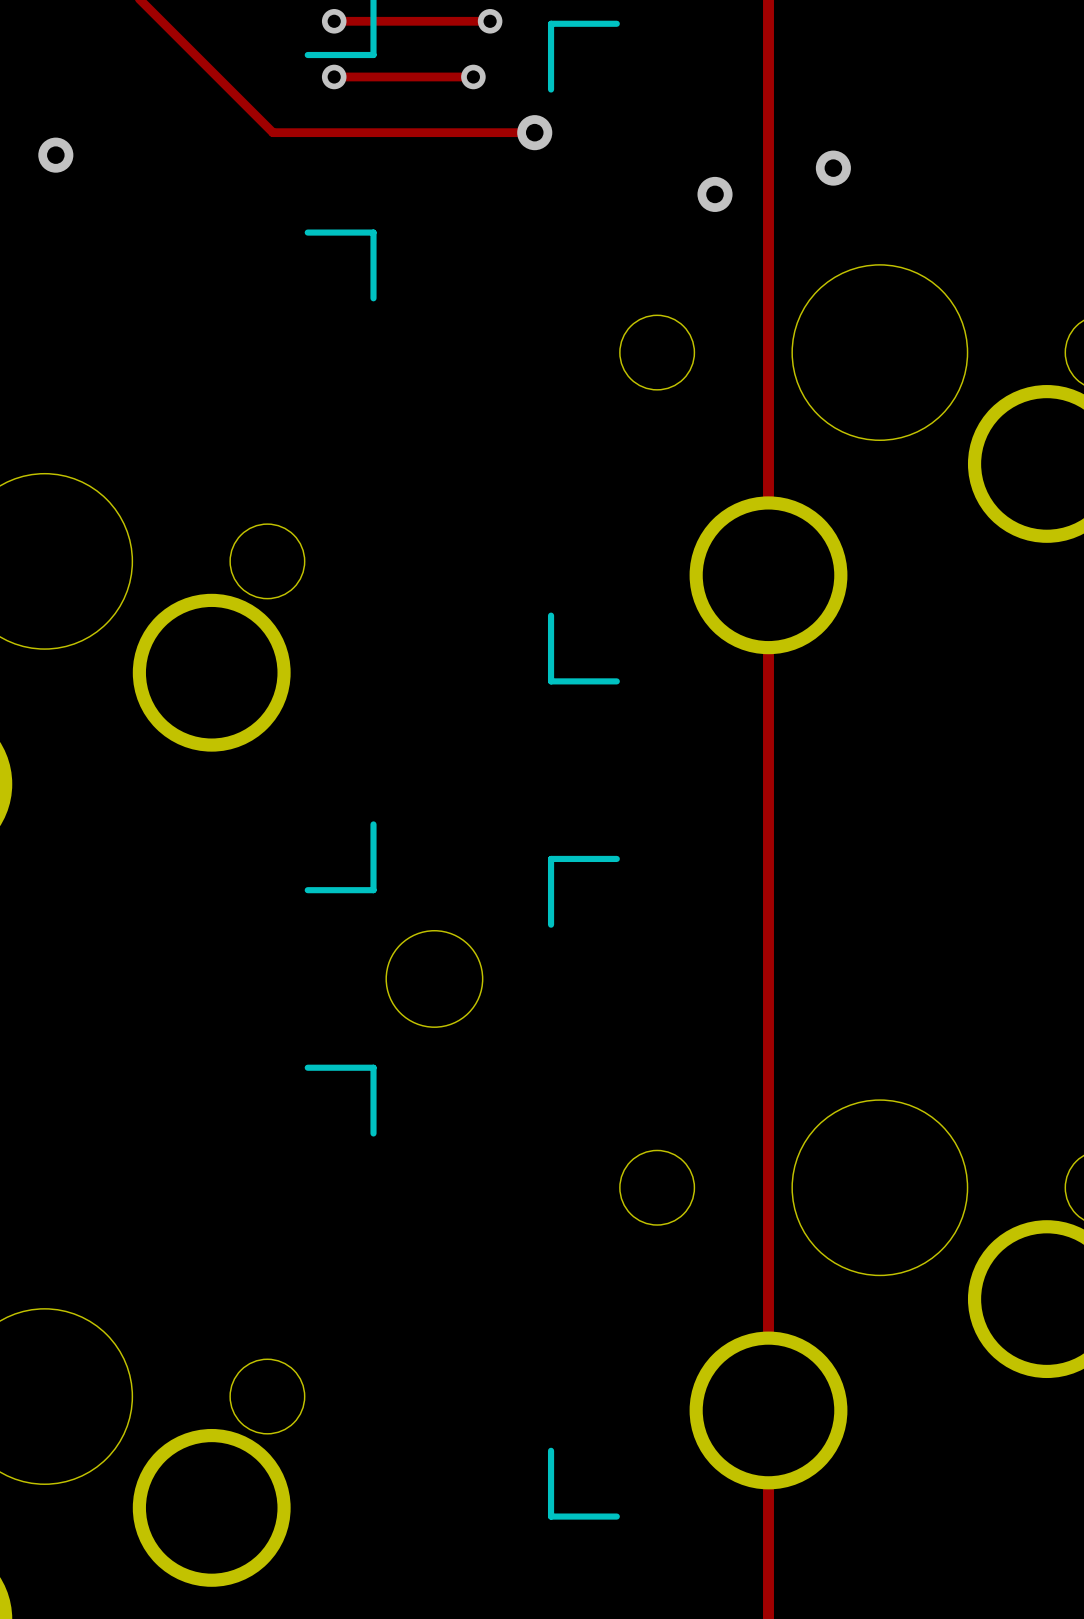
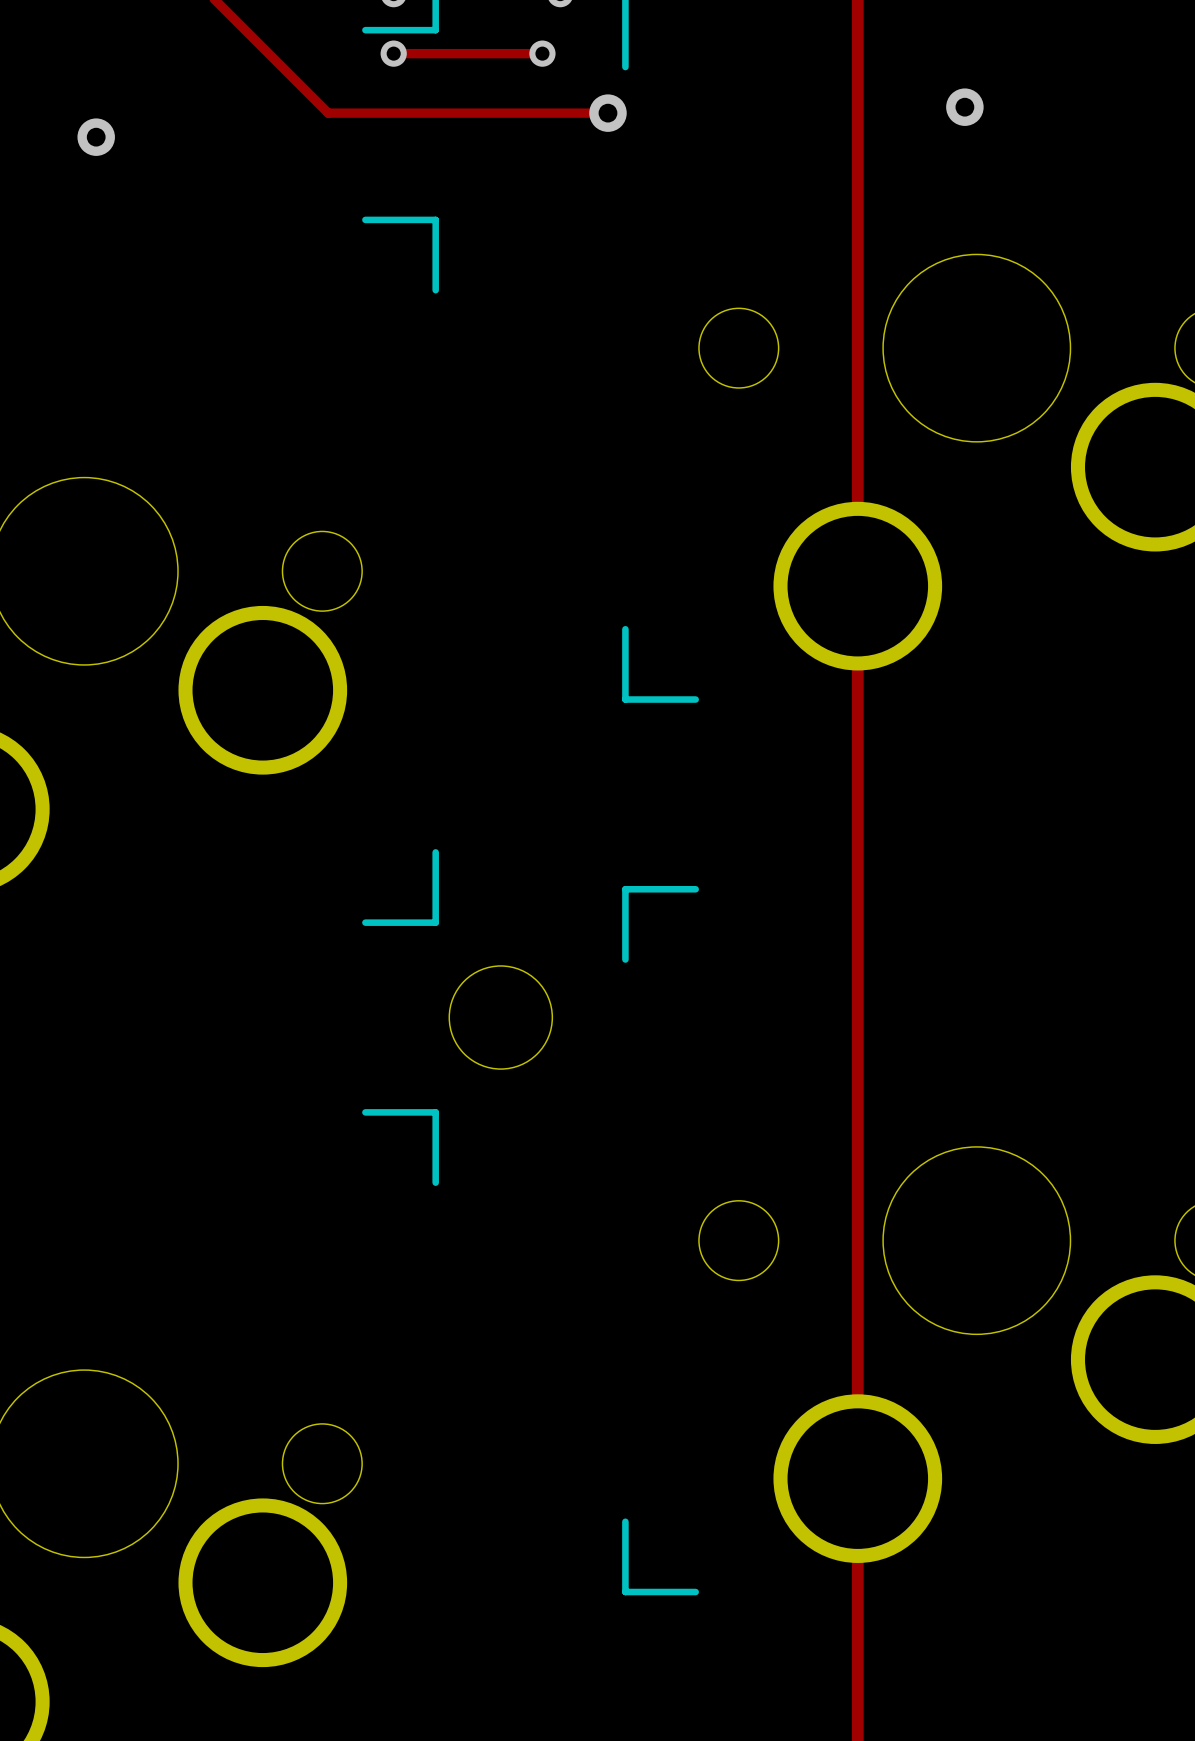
via position: (833, 168) -> (964, 107)
via: (715, 194) -> none

